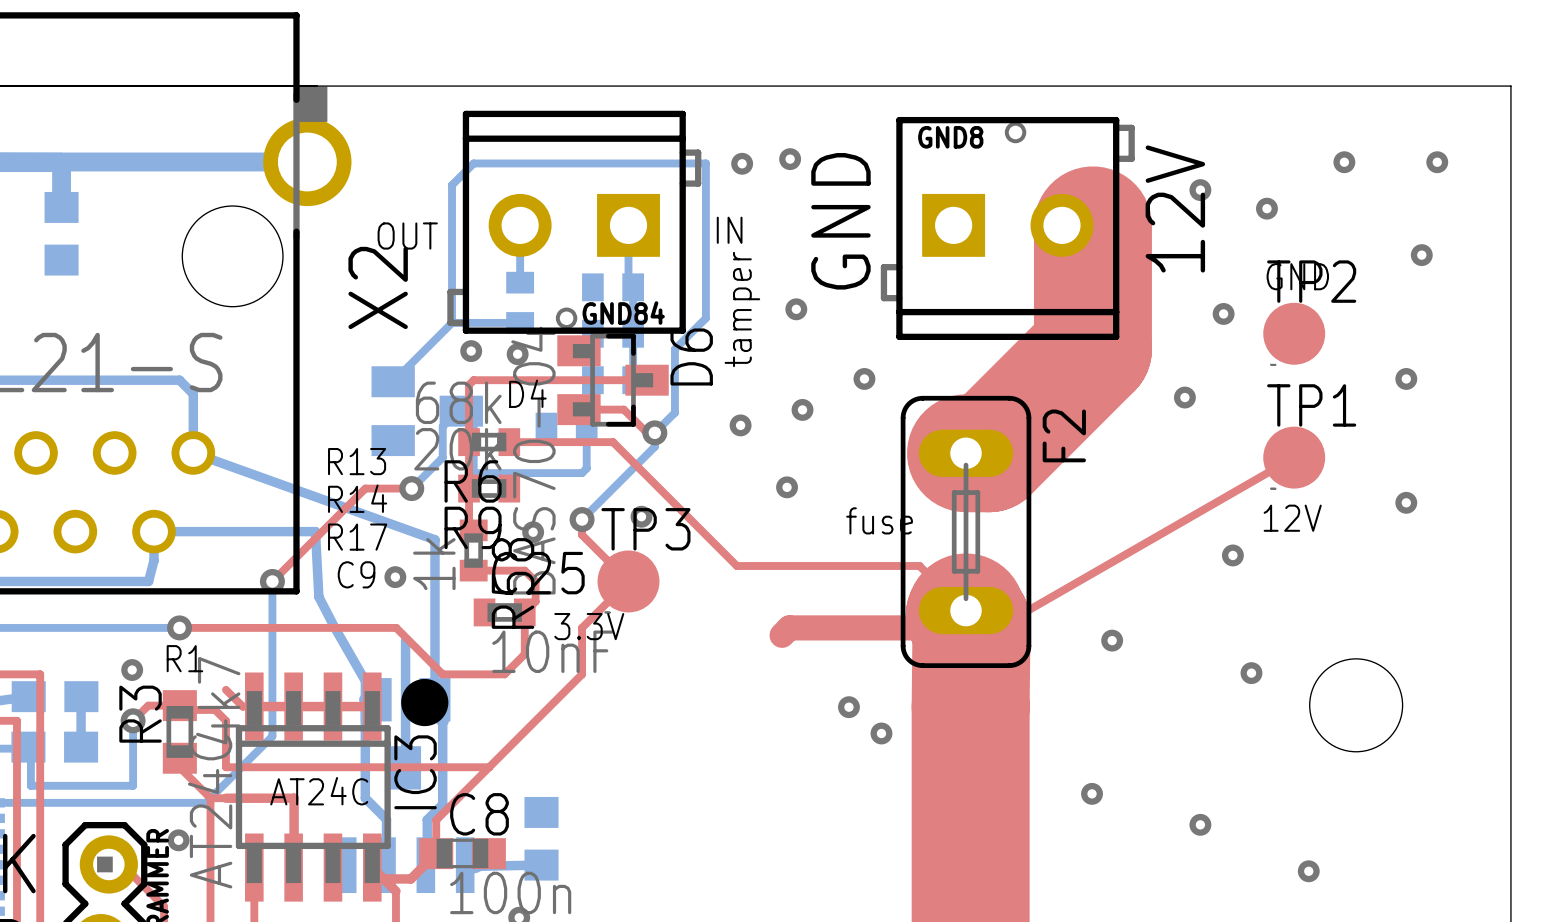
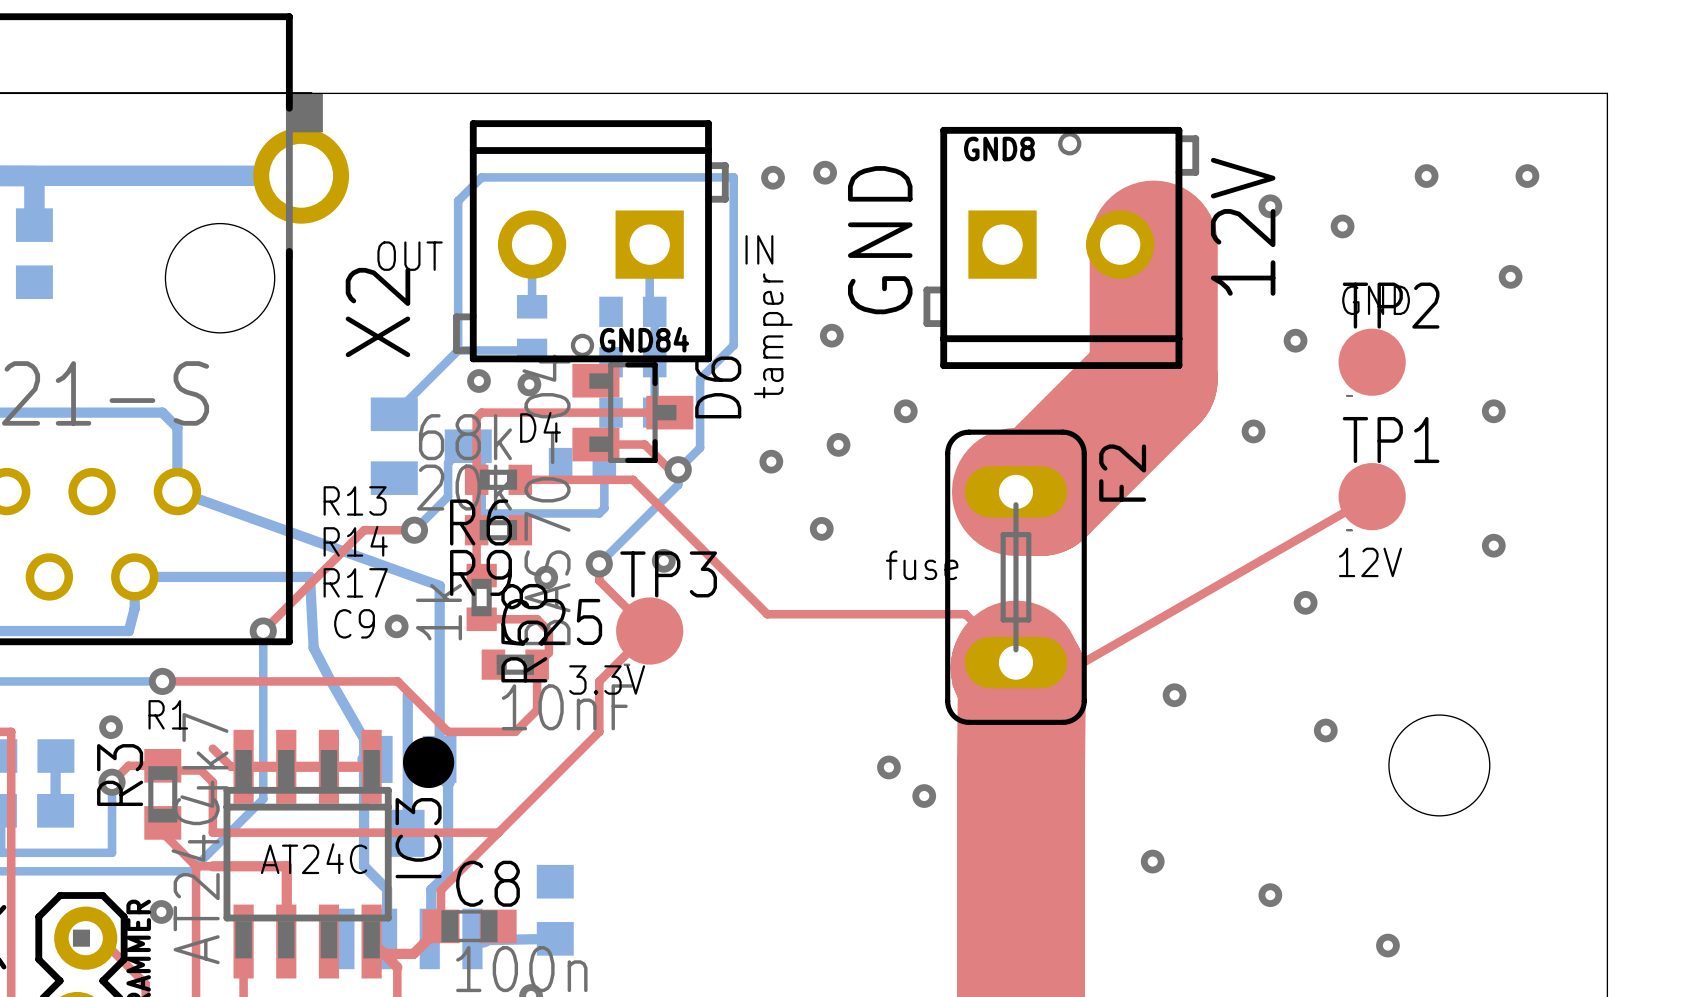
top track: (919, 627) (789, 627) (782, 635) -> none

